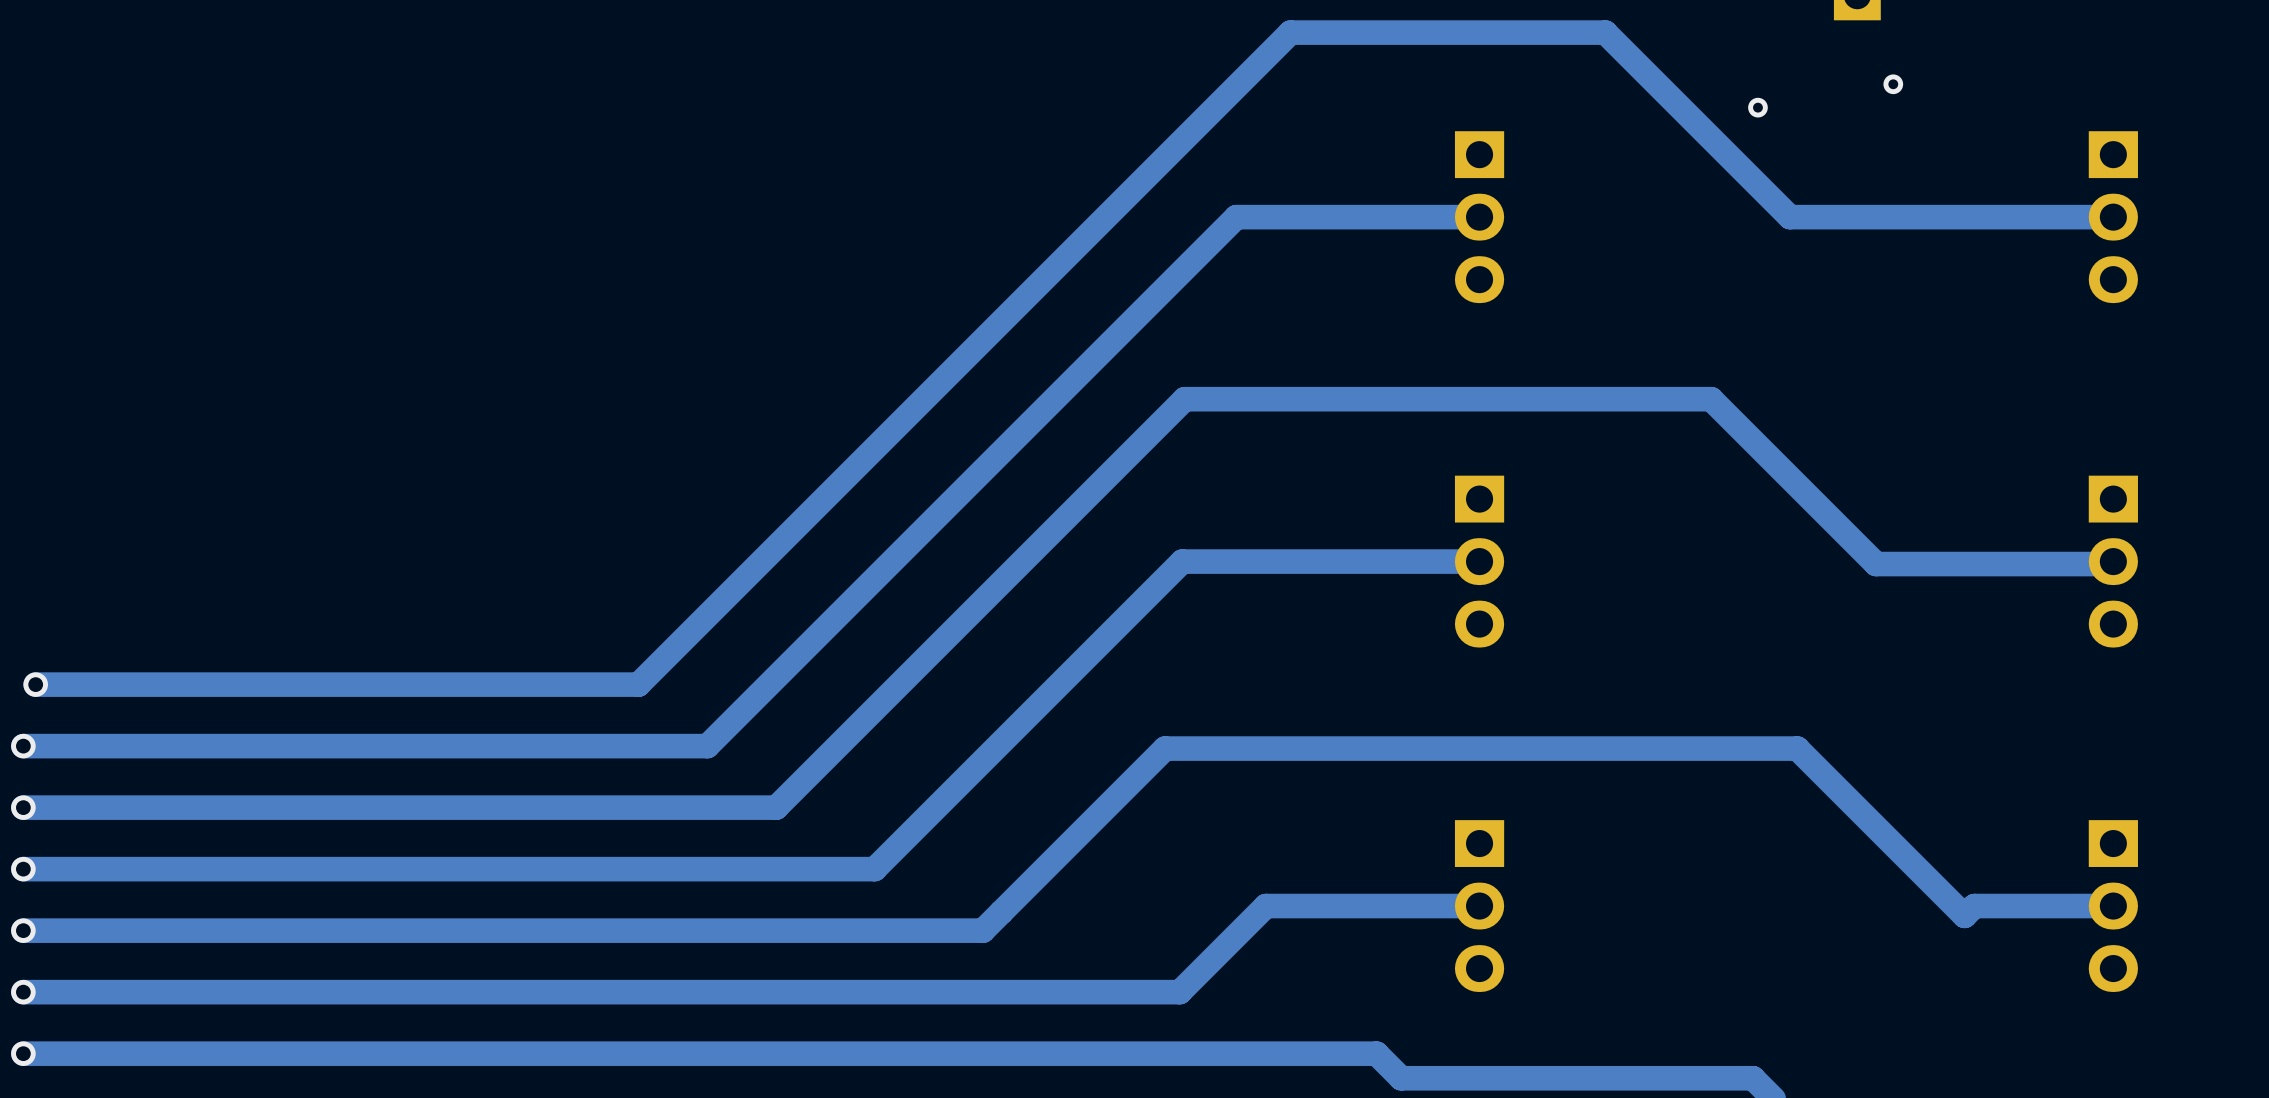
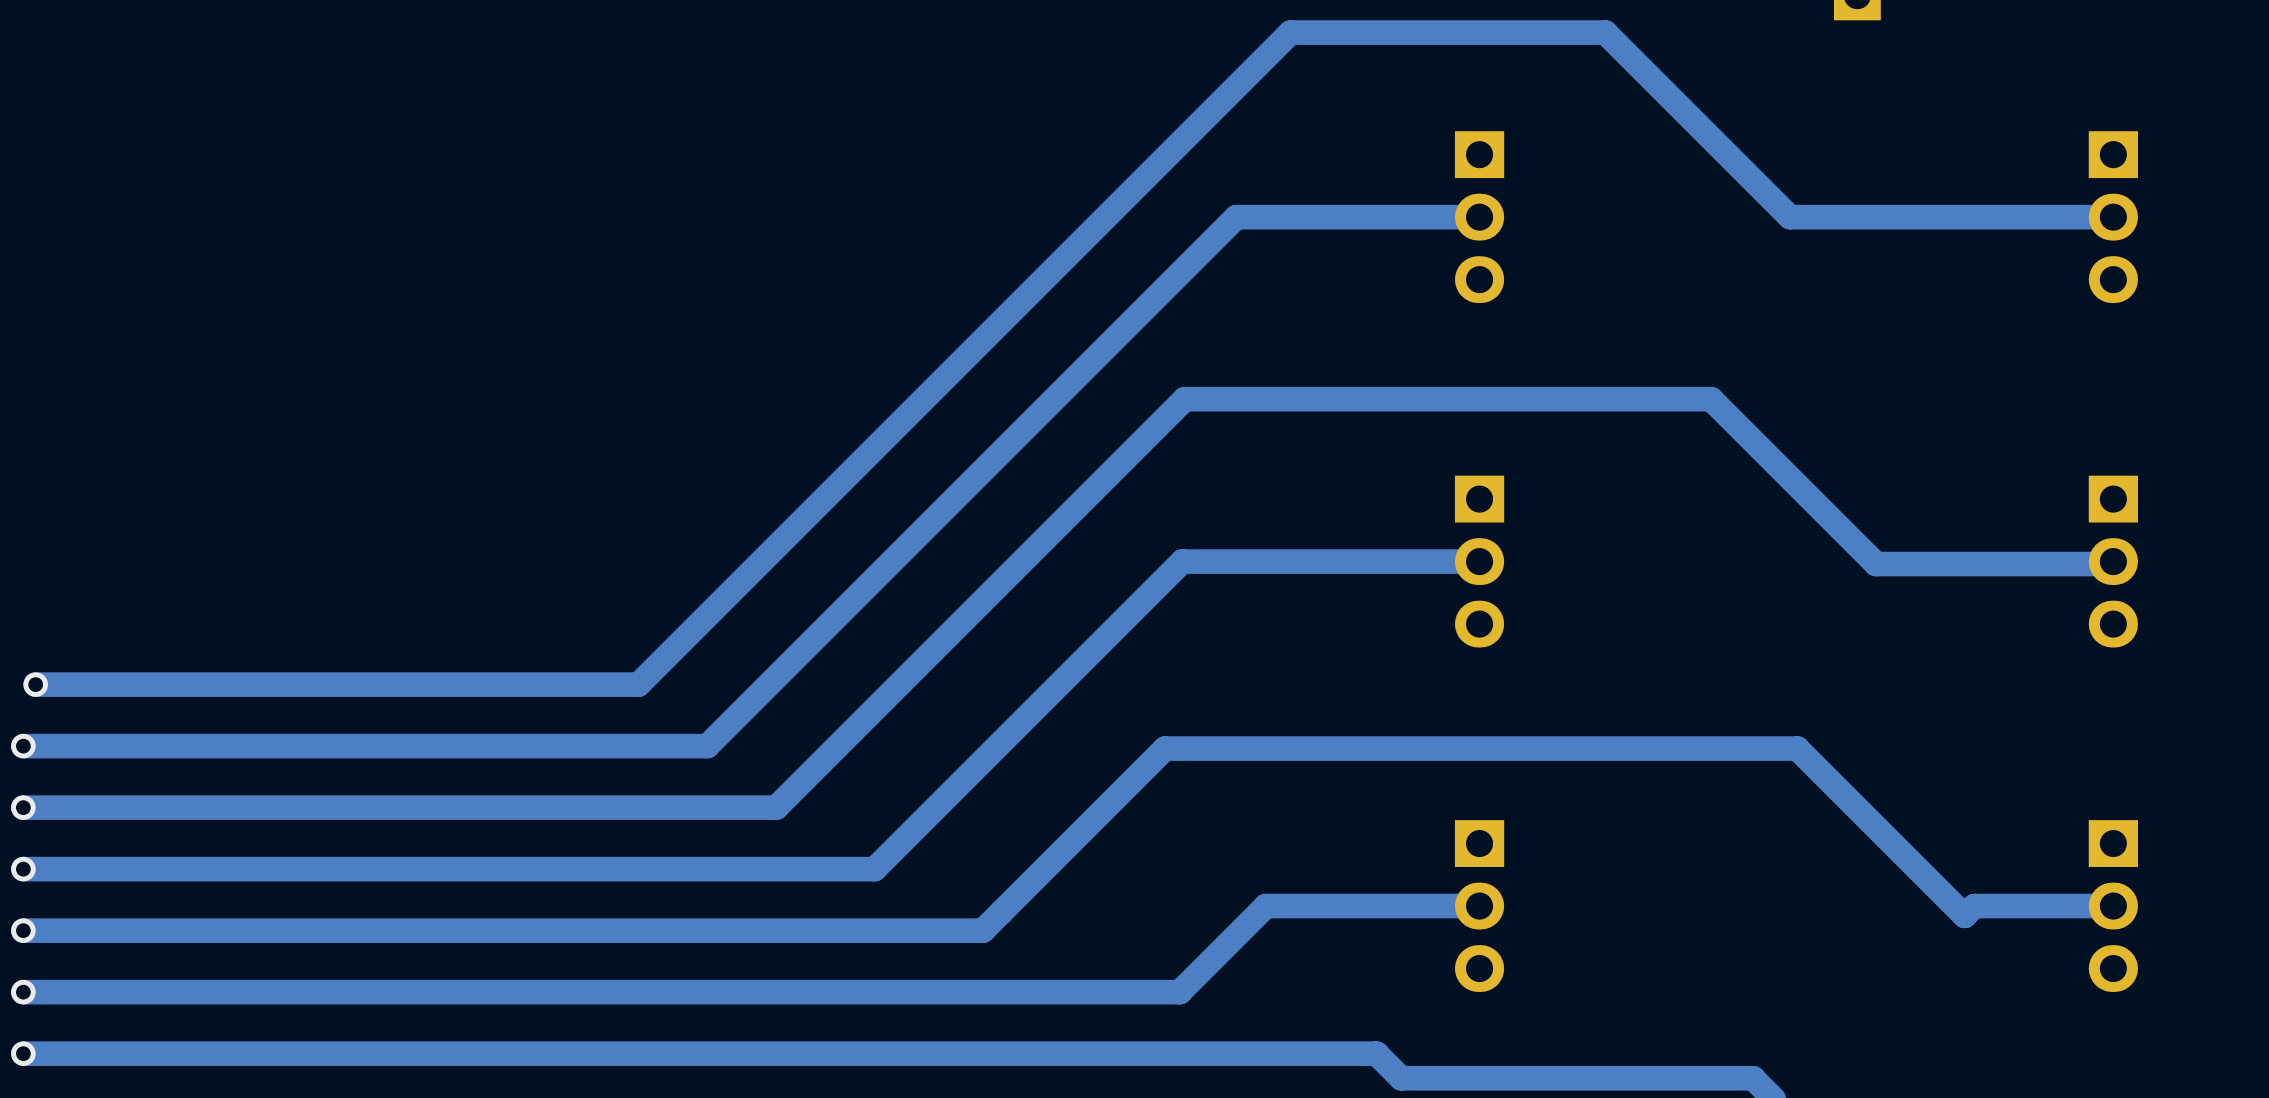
via: (1893, 84) -> none
via: (1757, 107) -> none

